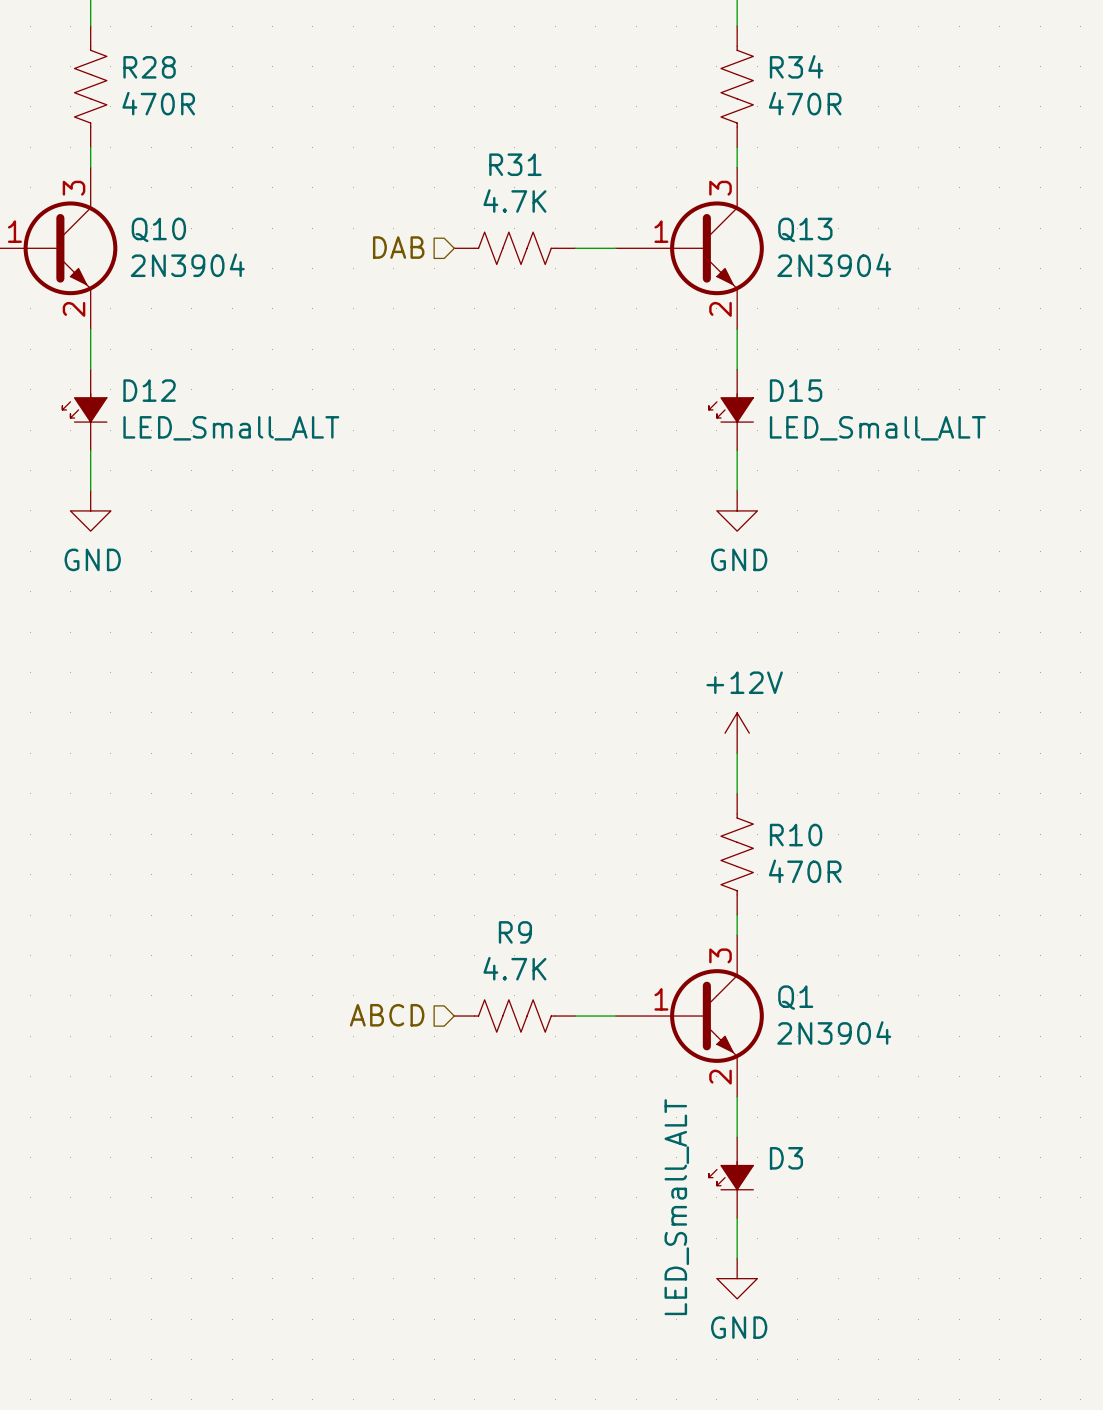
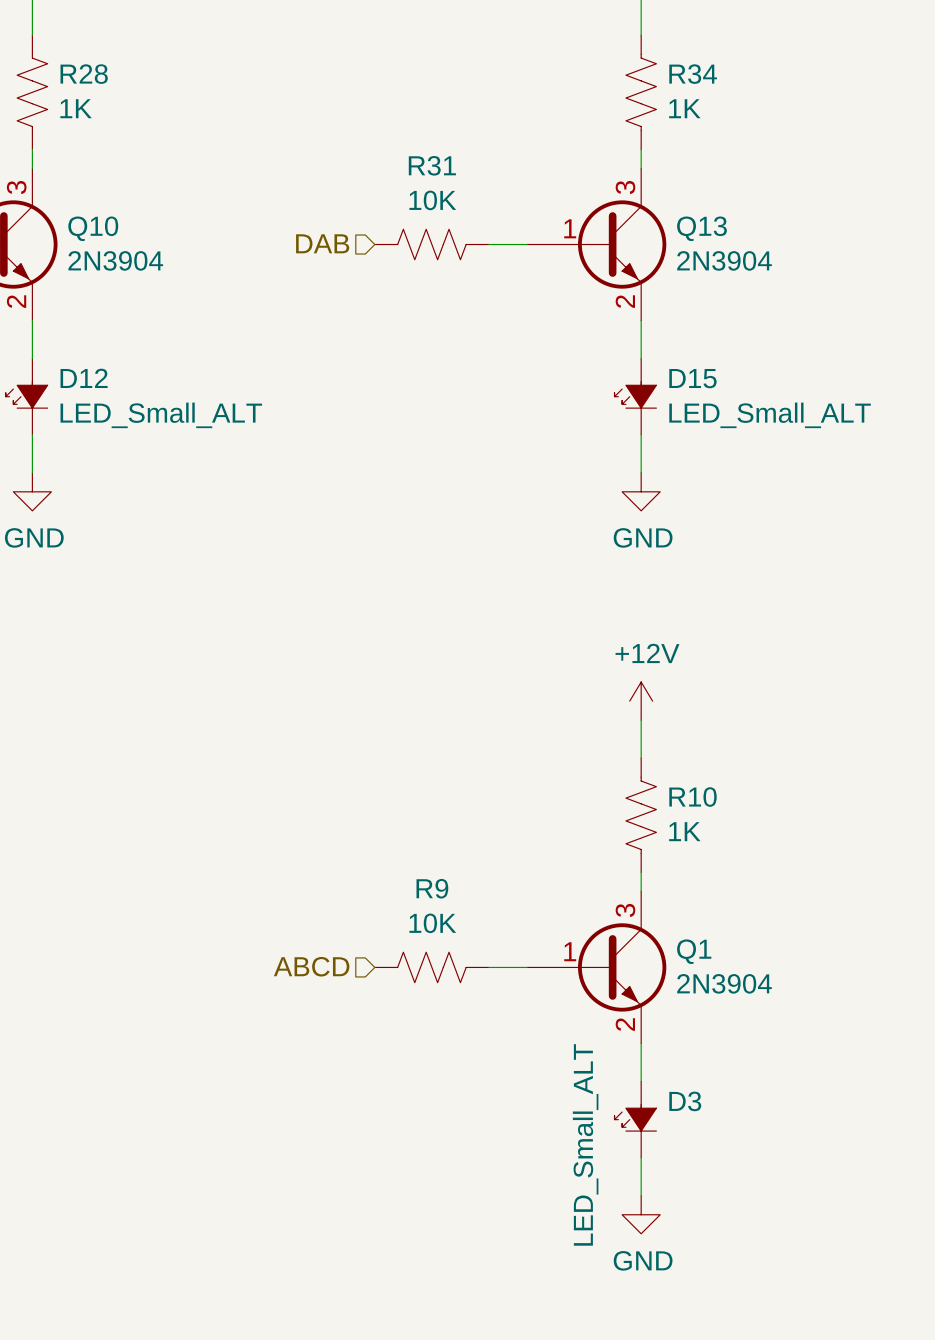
R28 value: 470R (158, 103) -> 1K (76, 108)
R34 value: 470R (805, 103) -> 1K (684, 108)
R31 value: 4.7K (514, 201) -> 10K (432, 200)
R10 value: 470R (805, 871) -> 1K (684, 831)
R9 value: 4.7K (514, 968) -> 10K (432, 923)

